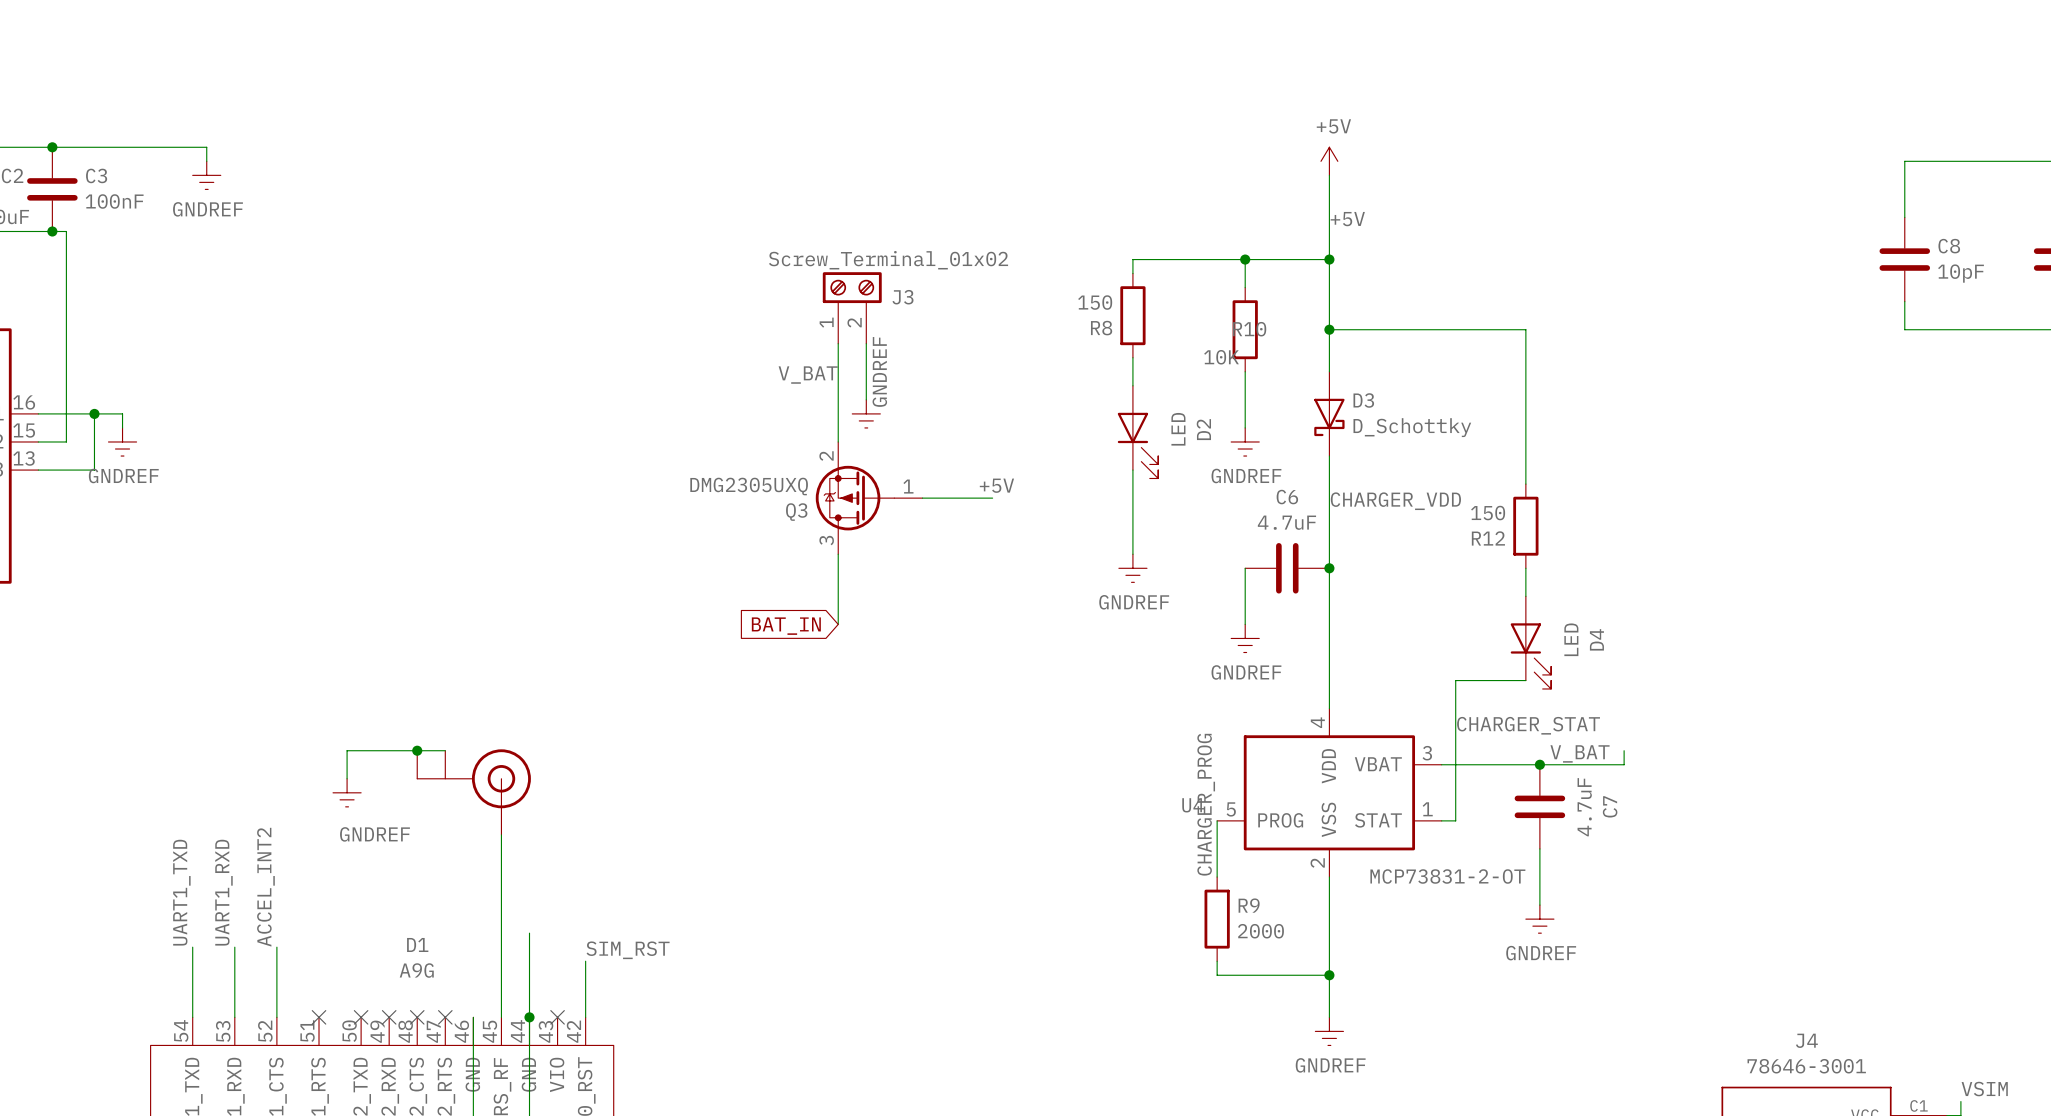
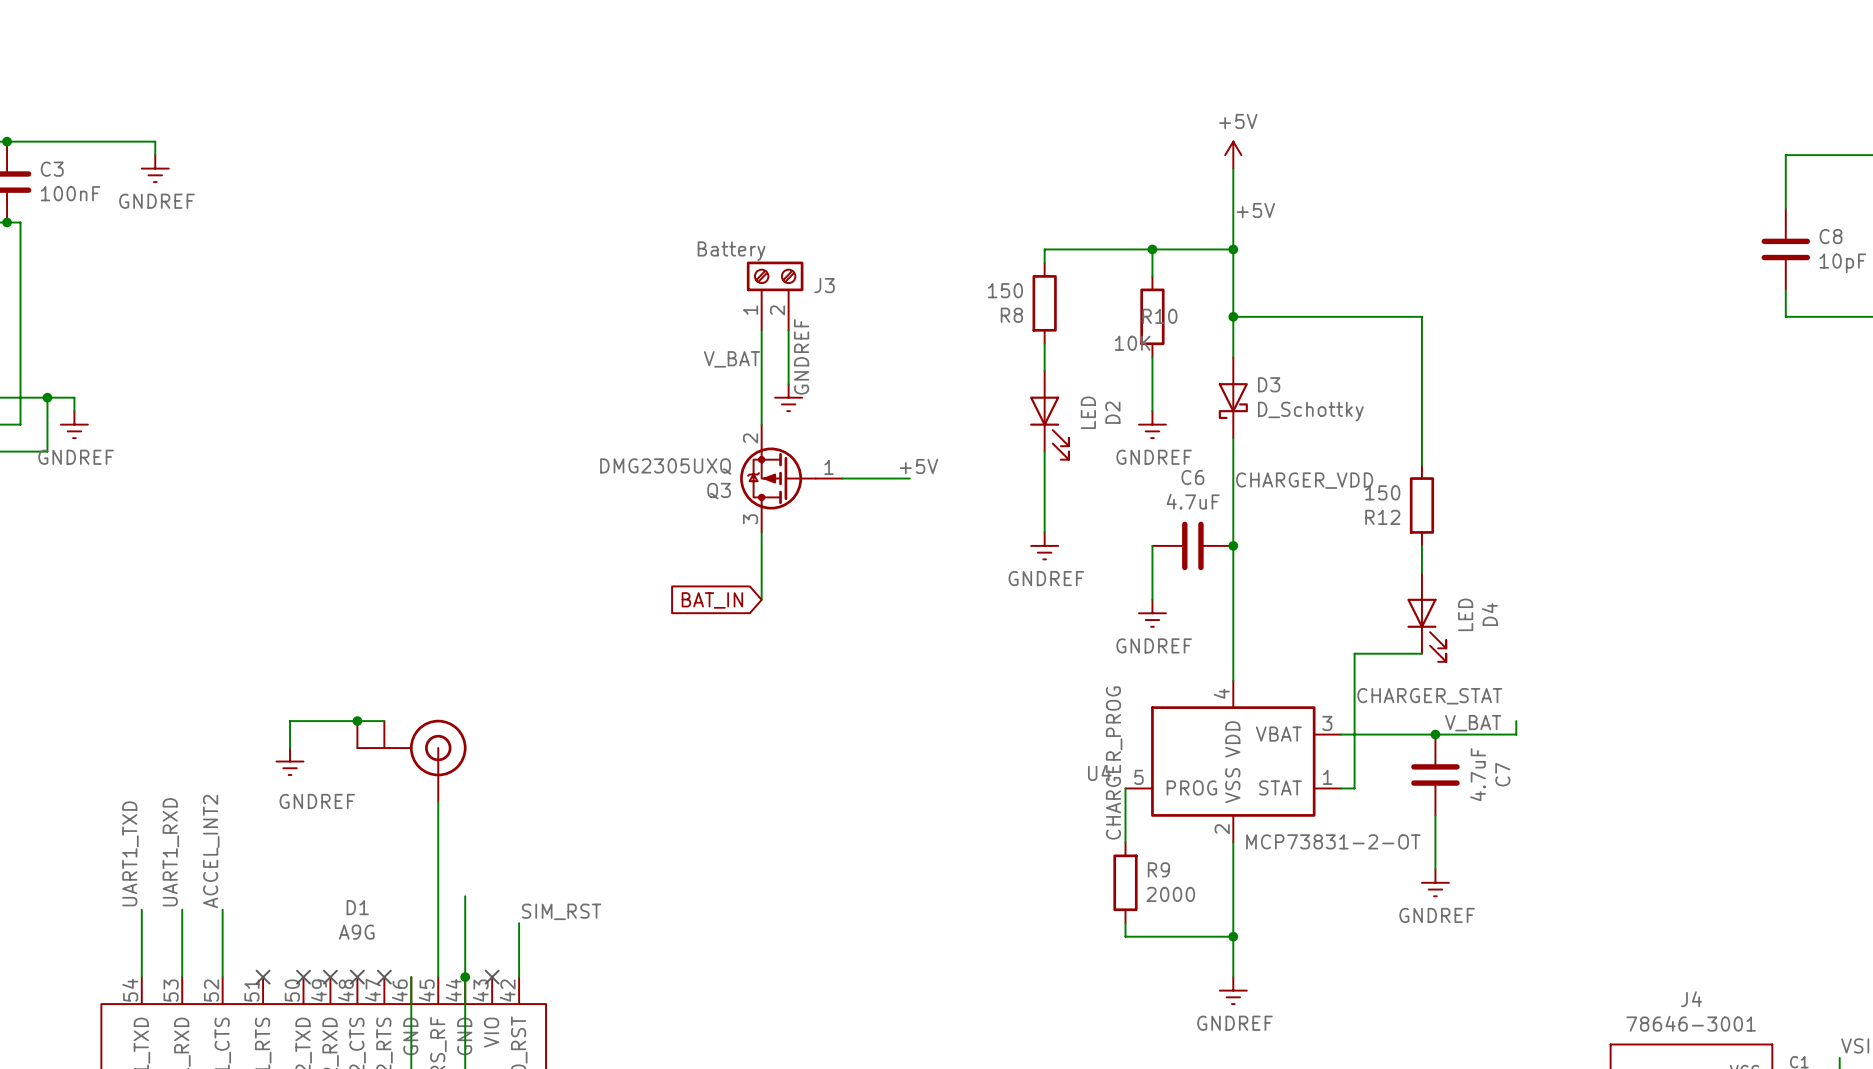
J3 value: Screw_Terminal_01x02 (888, 260) -> Battery (731, 251)

